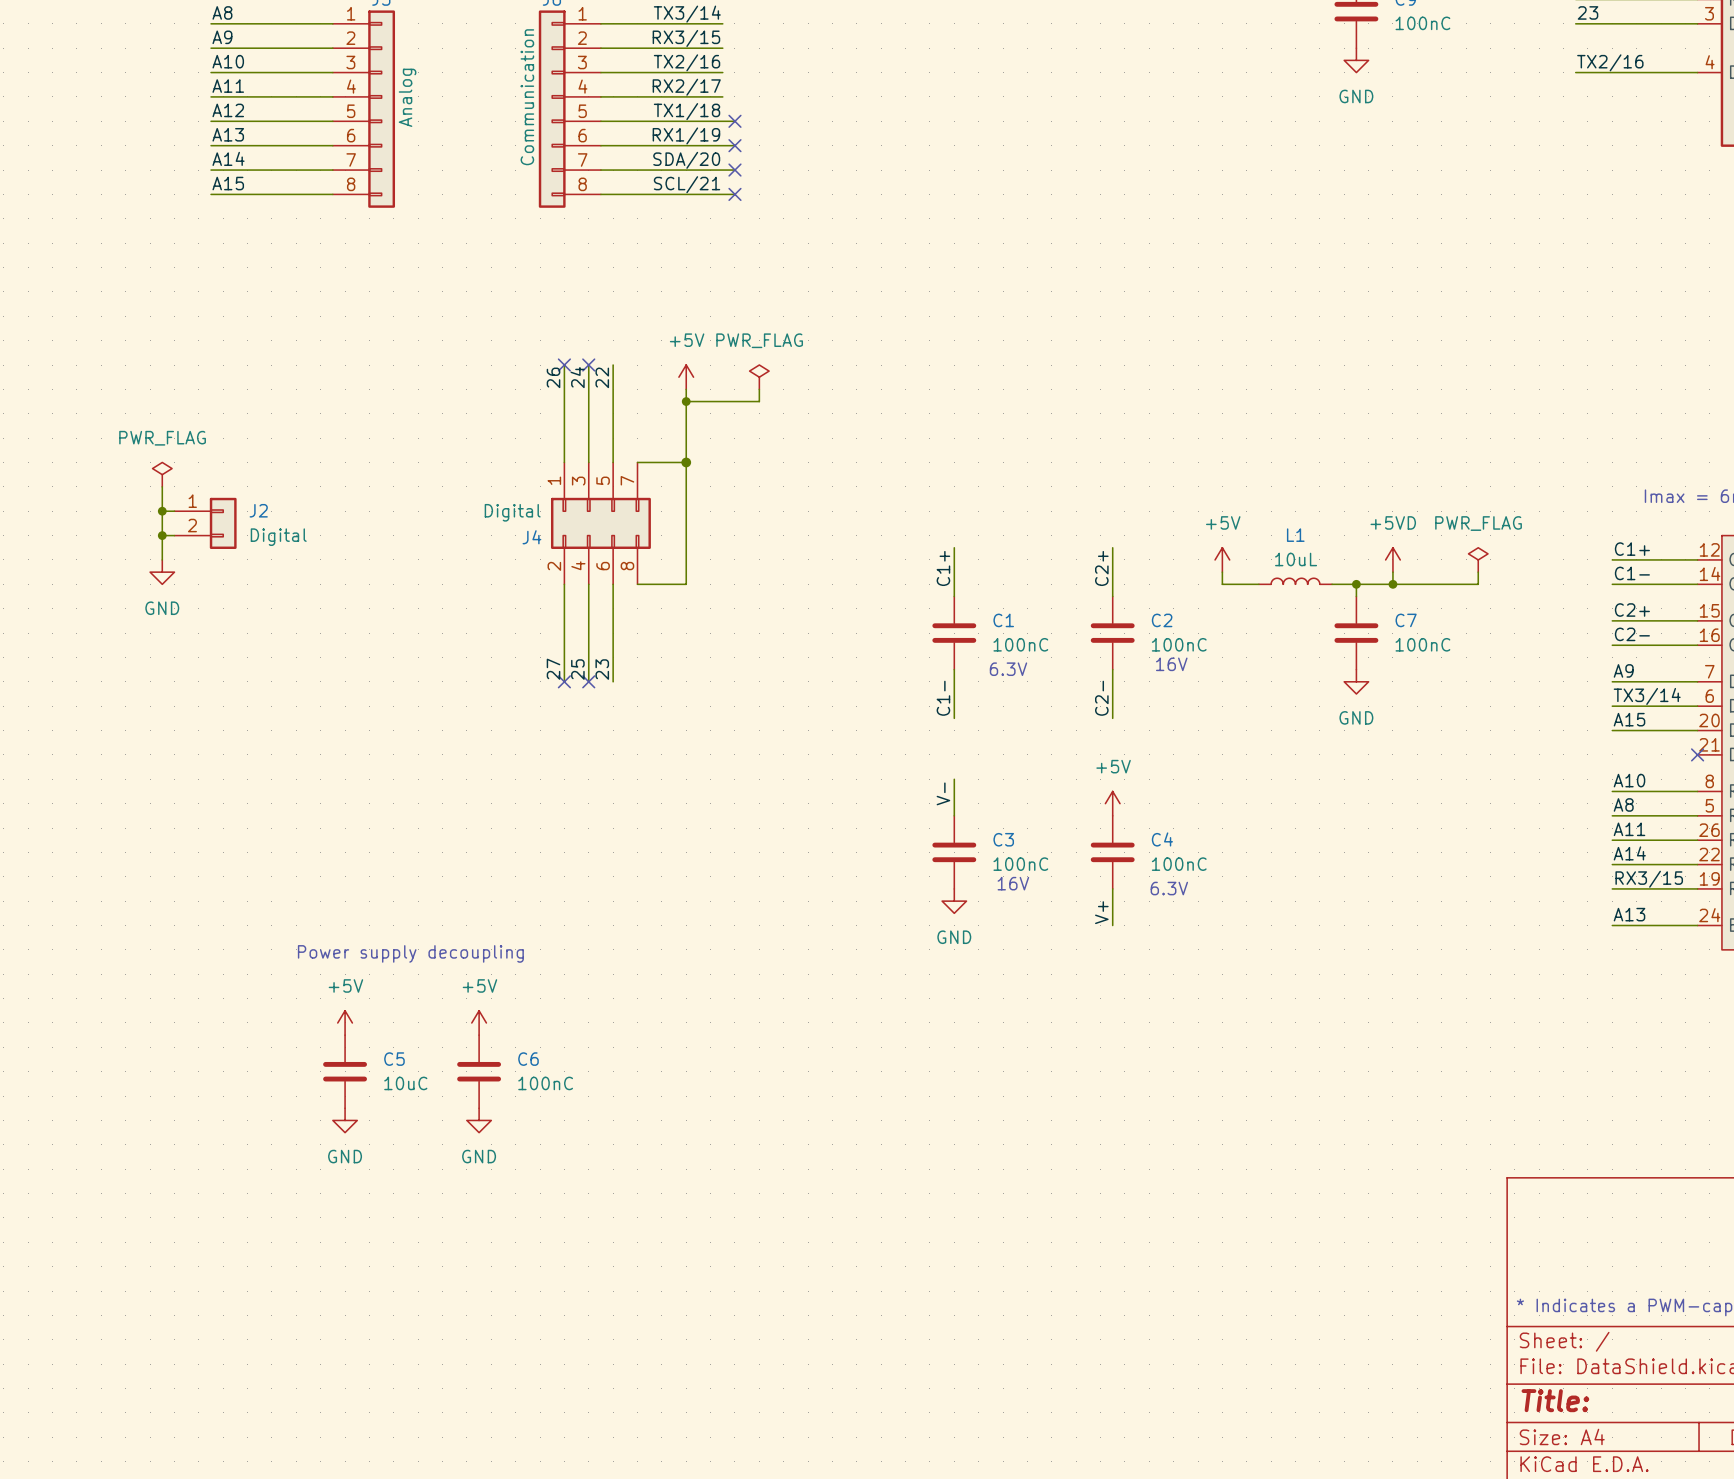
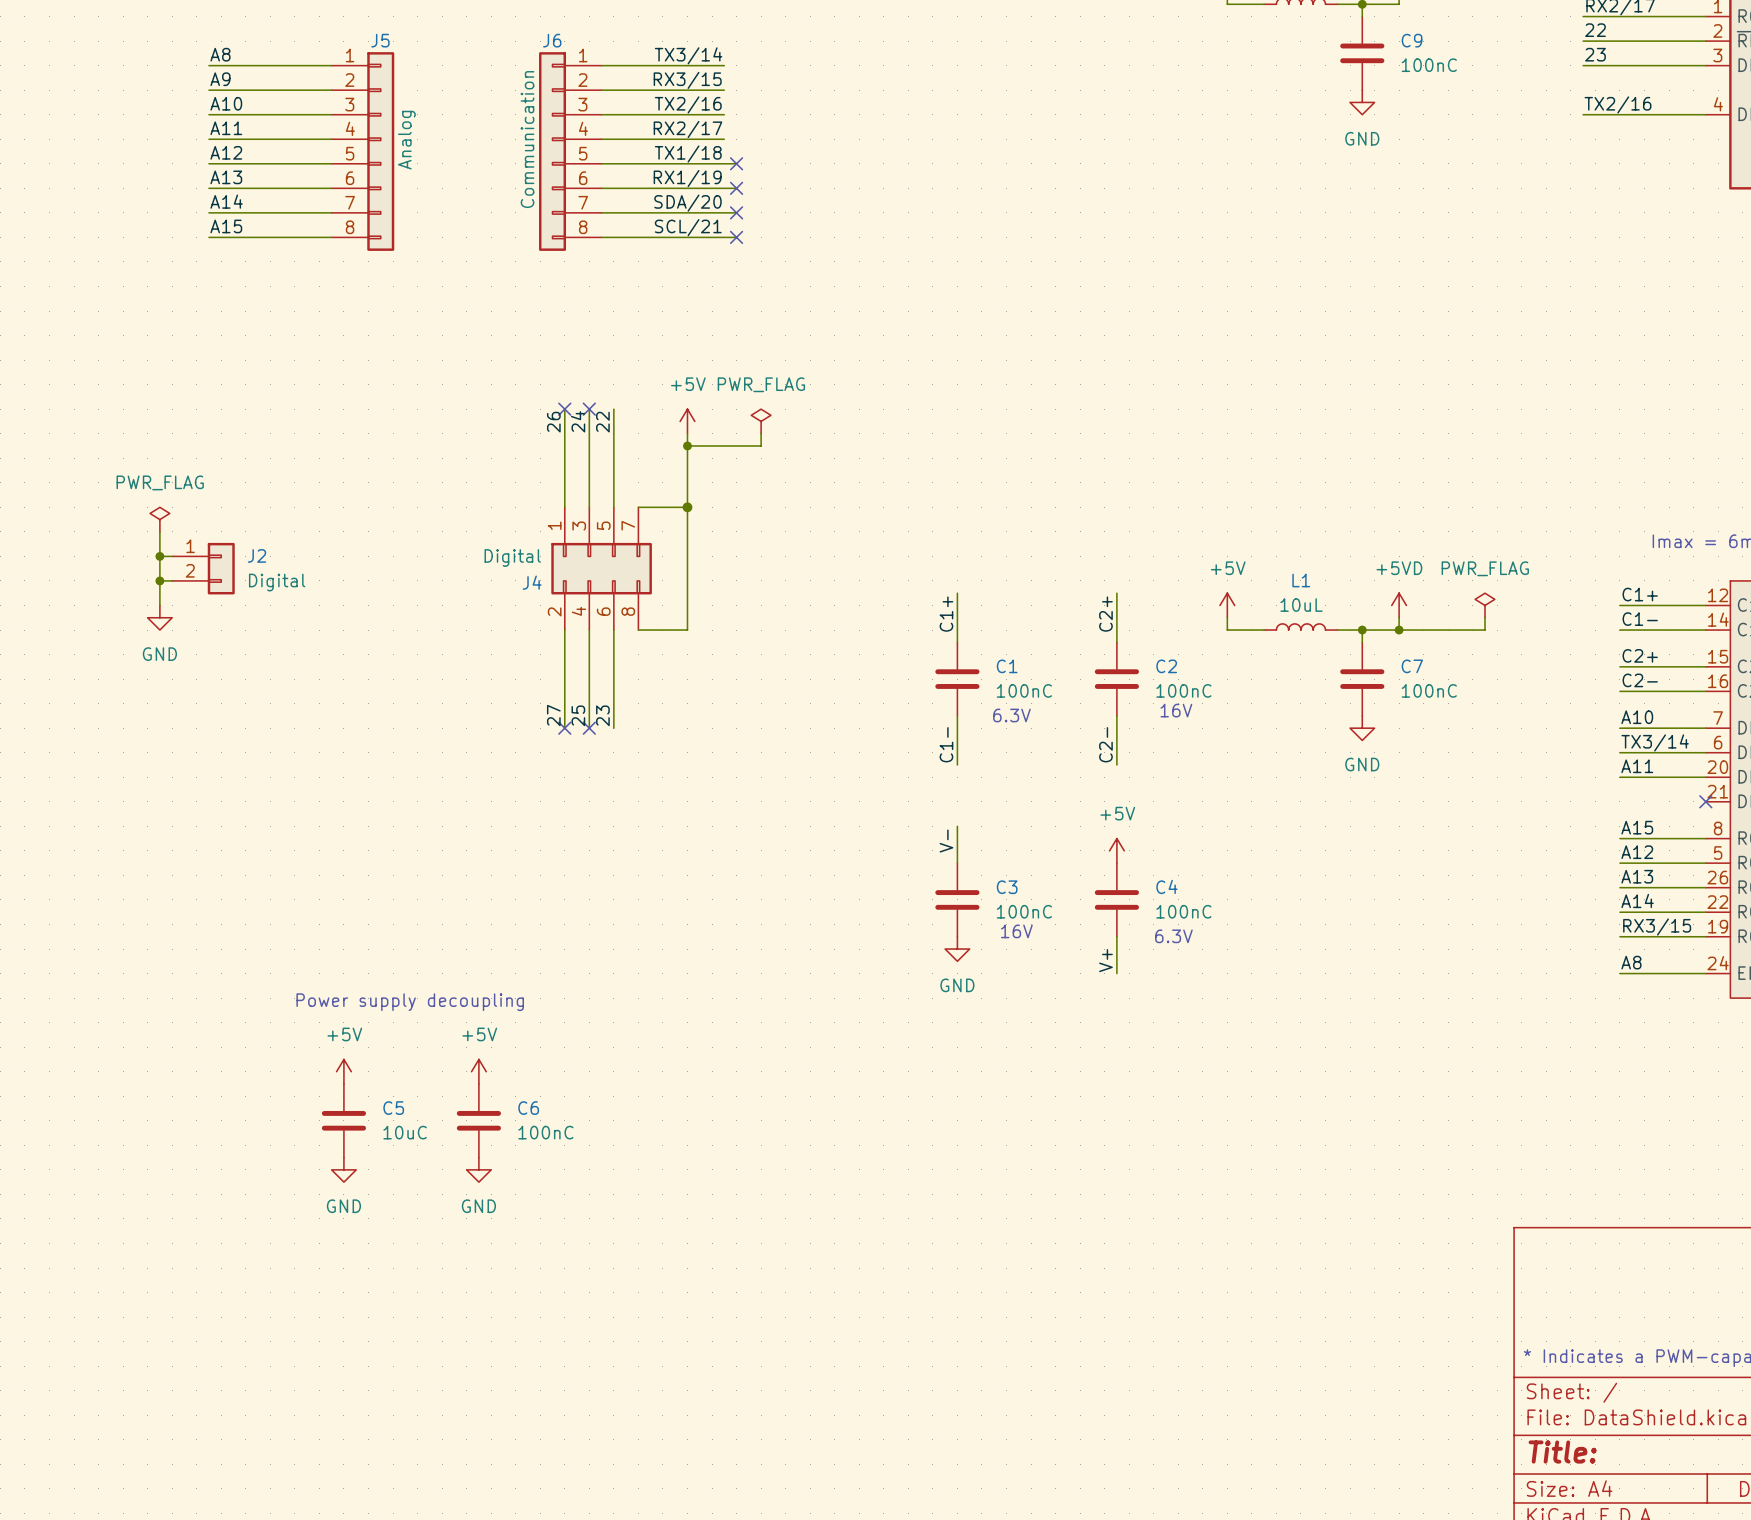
label: A9 (1623, 670) -> A10 (1637, 717)
label: A15 (1629, 719) -> A11 (1637, 766)
label: A10 (1629, 780) -> A15 (1637, 827)
label: A8 (1623, 804) -> A12 (1637, 852)
label: A11 (1629, 829) -> A13 (1637, 876)
label: A13 (1629, 914) -> A8 (1631, 962)

